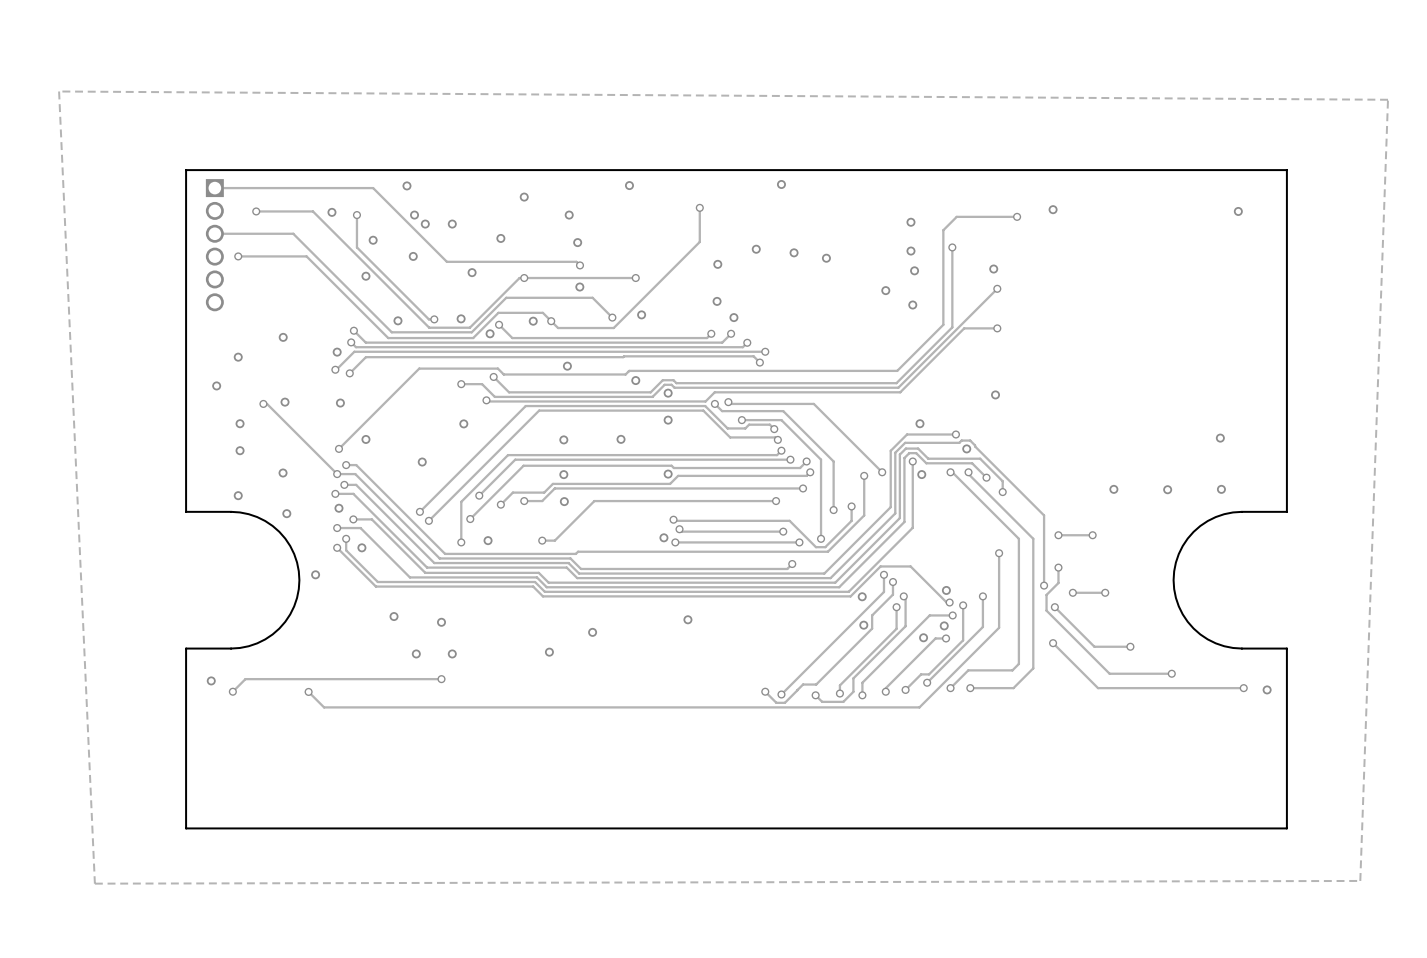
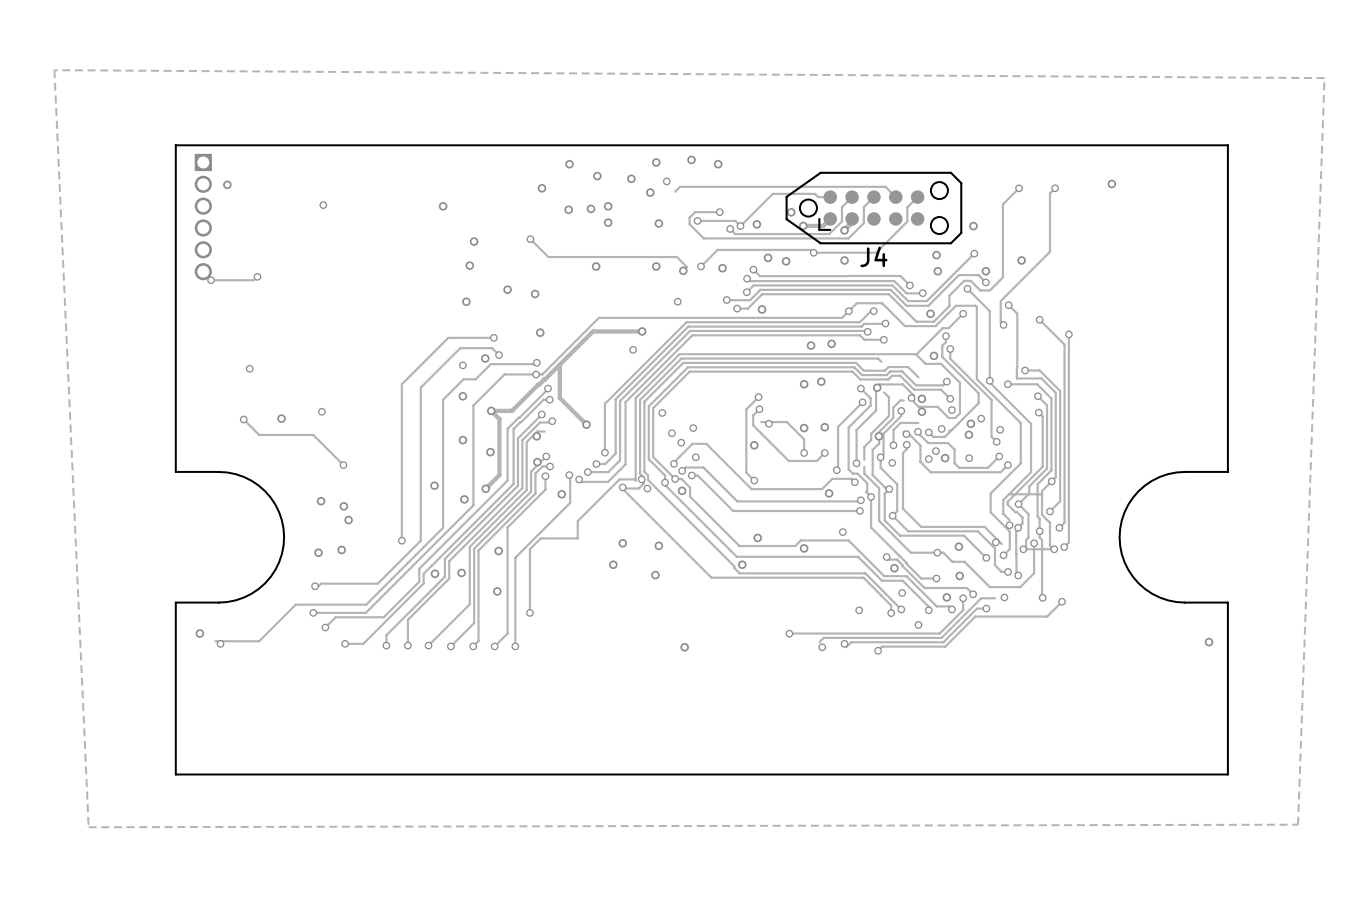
via: (781, 184) -> none
via: (406, 185) -> none
via: (629, 185) -> none
via: none -> (691, 159)
track: (214, 188) (373, 188) (446, 261) (576, 261) (580, 265) -> none
via: none -> (656, 162)
via: none -> (569, 164)
via: none -> (718, 164)
via: (524, 197) -> none
via: none -> (597, 176)
via: none -> (631, 178)
track: (699, 207) (699, 241) (613, 328) (558, 328) (542, 312) (498, 312) (473, 338) (388, 338) (306, 256) (238, 256) -> none
via: (1053, 209) -> none
via: none -> (1111, 183)
via: none -> (227, 184)
track: (256, 211) (312, 211) (429, 327) (469, 327) (519, 278) (635, 278) -> none
via: (256, 211) -> none
via: (1238, 211) -> none
via: (331, 212) -> none
track: (356, 215) (356, 247) (428, 319) (434, 319) -> none
via position: (356, 215) -> (323, 205)
via: (414, 215) -> none
track: none -> (1019, 188) (1002, 204) (1002, 277) (989, 290) (980, 290) (970, 280) (964, 280) (949, 295) (949, 306) (933, 321) (916, 321) (888, 294) (762, 294) (747, 308) (737, 308)
via: none -> (1019, 188)
track: none -> (1055, 188) (1049, 193) (1049, 251) (1000, 301) (1000, 322) (1003, 324)
via: none -> (1055, 188)
track: (1017, 216) (956, 216) (943, 230) (943, 324) (897, 370) (629, 370) (625, 374) (503, 374) (497, 368) (419, 368) (338, 448) -> none
via: (1017, 216) -> none
track: none -> (675, 191) (680, 186) (885, 186) (895, 197)
via: none -> (650, 192)
via: (910, 222) -> none
via: (425, 224) -> none
via position: (452, 224) -> (443, 206)
track: none -> (830, 197) (818, 197) (814, 193) (772, 193) (740, 226) (735, 220) (697, 220)
track: none -> (852, 197) (841, 207) (841, 221) (829, 234) (735, 234) (730, 228)
track: none -> (873, 197) (863, 207) (863, 223) (848, 238) (703, 238) (689, 224) (689, 217) (695, 212) (719, 212)
track: none -> (917, 197) (907, 207) (907, 221) (876, 252) (813, 252) (810, 249) (717, 249) (701, 266)
track: (214, 233) (293, 233) (391, 332) (471, 332) (506, 297) (592, 297) (612, 317) -> none
via: none -> (608, 206)
J4: none -> (873, 208)
via: none -> (590, 208)
via: (500, 238) -> none
via: (373, 240) -> none
via: none -> (719, 212)
via: none -> (791, 212)
via position: (577, 242) -> (568, 209)
track: none -> (830, 218) (823, 225) (803, 225)
track: (952, 247) (952, 327) (896, 383) (676, 383) (673, 380) (662, 380) (650, 392) (509, 392) (493, 376) -> none
via: (952, 247) -> none
via: none -> (697, 220)
via: (756, 249) -> none
via: none -> (608, 222)
via: none -> (658, 223)
via: (910, 251) -> none
via: none -> (740, 226)
via: none -> (803, 225)
via: none -> (973, 226)
via: (238, 256) -> none
via: (413, 256) -> none
via: none -> (730, 228)
via: (826, 258) -> none
via: none -> (844, 230)
via: (717, 264) -> none
via: (580, 265) -> none
track: none -> (530, 239) (548, 257) (676, 257) (687, 267)
via: none -> (530, 239)
via: (993, 269) -> none
via: none -> (474, 241)
via: (914, 270) -> none
via: (472, 272) -> none
via: (365, 276) -> none
via: (524, 278) -> none
via: (635, 278) -> none
via: none -> (813, 252)
track: none -> (974, 253) (926, 301) (908, 301) (892, 285) (753, 285) (746, 292)
via: none -> (974, 253)
via: none -> (936, 255)
via: (579, 287) -> none
via: none -> (768, 257)
track: (997, 288) (898, 387) (674, 387) (671, 384) (664, 384) (652, 396) (494, 396) (482, 384) (461, 384) -> none
via: (997, 288) -> none
via: none -> (1021, 260)
via: none -> (786, 261)
via: none -> (469, 265)
via: none -> (596, 266)
via: none -> (656, 266)
via: none -> (701, 266)
via: none -> (722, 268)
track: none -> (753, 269) (760, 276) (847, 276)
via: none -> (753, 269)
via: none -> (937, 271)
via: none -> (985, 271)
via: (912, 305) -> none
track: none -> (848, 275) (900, 275) (909, 285)
track: none -> (257, 276) (254, 280) (211, 280)
via: none -> (257, 276)
track: none -> (747, 278) (749, 281) (894, 281) (906, 293) (922, 293)
via: none -> (747, 278)
via: none -> (211, 280)
track: none -> (985, 282) (978, 275) (959, 275) (928, 305) (906, 305) (890, 289) (760, 289) (750, 300) (726, 300)
via: none -> (985, 282)
via: (641, 314) -> none
via: none -> (909, 285)
via: (612, 317) -> none
via: (733, 317) -> none
via: (461, 318) -> none
via: (434, 319) -> none
via: (397, 320) -> none
track: none -> (967, 288) (989, 311) (989, 382) (1031, 423) (1031, 472) (1003, 500) (1003, 513) (1009, 520)
via: none -> (967, 288)
via: (551, 321) -> none
via: none -> (746, 292)
track: (499, 324) (512, 338) (707, 338) (711, 333) -> none
via: (499, 324) -> none
via: none -> (922, 293)
via: none -> (535, 294)
track: (997, 328) (964, 328) (900, 392) (714, 392) (705, 401) (486, 400) -> none
via: (997, 328) -> none
track: (353, 330) (365, 342) (722, 342) (731, 333) -> none
via: (353, 330) -> none
via: none -> (726, 300)
via: (731, 333) -> none
via: (283, 337) -> none
track: none -> (1008, 305) (1017, 313) (1016, 378) (1041, 378) (1055, 392) (1055, 477) (1042, 491) (1042, 514) (1049, 522) (1049, 545) (1052, 548)
via: none -> (1008, 305)
via: none -> (737, 308)
via: none -> (762, 309)
track: (351, 342) (355, 347) (742, 347) (747, 342) -> none
via: (351, 342) -> none
via: (747, 342) -> none
via: none -> (848, 311)
track: none -> (873, 311) (870, 311) (859, 322) (686, 322) (604, 403) (604, 452)
via: none -> (873, 311)
via: none -> (930, 313)
track: none -> (963, 313) (948, 328) (942, 328) (916, 354) (679, 354) (635, 398) (635, 480) (619, 479) (577, 521) (577, 538) (540, 538) (529, 549) (529, 612)
via: none -> (963, 313)
track: (765, 351) (354, 351) (335, 369) -> none
via: (765, 351) -> none
via: (337, 352) -> none
track: none -> (1039, 319) (1064, 344) (1064, 522) (1059, 527)
via: none -> (1039, 319)
track: none -> (886, 322) (864, 323) (861, 326) (688, 326) (615, 399) (615, 453) (605, 464) (596, 464)
via: none -> (885, 323)
via: (238, 357) -> none
via: none -> (1003, 324)
track: (759, 362) (753, 356) (365, 357) (349, 373) -> none
via: (759, 362) -> none
track: none -> (642, 331) (592, 331) (512, 410) (491, 410) (499, 419) (499, 475) (485, 488)
via: none -> (642, 331)
track: none -> (868, 330) (690, 330) (620, 401) (620, 460) (608, 472) (587, 472)
via: none -> (867, 331)
track: none -> (1068, 334) (1068, 542) (1064, 547)
via: none -> (1068, 334)
via: (335, 369) -> none
track: none -> (945, 336) (945, 342) (942, 345) (942, 356) (978, 393) (978, 403) (944, 436) (933, 436) (928, 432)
via: none -> (945, 336)
track: none -> (493, 337) (448, 337) (401, 384) (401, 540)
via: none -> (493, 337)
via: (349, 373) -> none
track: none -> (883, 339) (864, 339) (859, 335) (692, 335) (625, 402) (625, 464) (607, 481) (581, 481) (579, 479)
via: none -> (883, 339)
via: (493, 376) -> none
via: none -> (831, 343)
via: none -> (811, 345)
via: (635, 380) -> none
track: none -> (950, 349) (950, 358) (991, 399) (991, 436) (996, 441)
via: none -> (950, 349)
via: (461, 384) -> none
via: none -> (633, 349)
via: (216, 385) -> none
track: none -> (915, 354) (925, 363) (941, 363) (959, 382) (959, 413) (955, 418) (948, 418) (937, 406) (918, 406) (913, 402) (913, 395) (902, 384) (880, 384) (876, 388) (876, 410) (856, 429) (856, 463)
track: none -> (499, 355) (492, 348) (460, 348) (420, 387) (420, 540) (377, 583) (321, 583) (315, 586)
via: none -> (499, 355)
via: none -> (485, 358)
via: (668, 393) -> none
via position: (995, 394) -> (933, 355)
track: none -> (881, 361) (878, 358) (681, 358) (640, 399) (640, 473) (643, 477) (643, 483) (638, 488) (622, 487) (622, 488) (711, 577) (863, 577) (891, 605) (891, 613)
track: none -> (536, 362) (490, 364) (475, 379) (463, 379) (443, 399) (443, 527) (366, 604) (295, 604) (259, 641) (215, 641)
via: none -> (536, 362)
track: none -> (559, 364) (559, 397) (586, 424)
via: (285, 402) -> none
track: (728, 402) (730, 403) (813, 403) (882, 472) -> none
via: (728, 402) -> none
track: (263, 403) (267, 403) (337, 474) (355, 474) (439, 558) (570, 558) (581, 568) (787, 568) (792, 564) -> none
via: (340, 403) -> none
track: (714, 403) (722, 411) (783, 411) (833, 461) (833, 510) -> none
via: (714, 403) -> none
track: none -> (1025, 370) (1039, 370) (1060, 390) (1060, 501) (1049, 511)
via: none -> (1025, 370)
via: none -> (536, 374)
track: none -> (918, 377) (908, 367) (888, 367) (884, 370) (863, 370) (856, 362) (683, 362) (644, 401) (644, 471) (648, 475) (648, 479) (739, 573) (865, 573) (885, 593)
via: none -> (989, 380)
via: none -> (821, 381)
track: none -> (946, 381) (943, 385) (916, 385) (902, 371) (890, 371) (886, 375) (862, 375) (854, 367) (687, 367) (648, 406) (648, 459) (665, 475) (665, 485) (736, 556) (858, 556) (881, 580) (902, 580) (928, 606) (928, 610)
via: none -> (946, 381)
via: (668, 420) -> none
track: (741, 420) (781, 420) (821, 459) (821, 538) -> none
via: (741, 420) -> none
via: none -> (804, 384)
track: none -> (1007, 384) (1037, 384) (1051, 398) (1051, 470) (1037, 484) (1037, 516) (1039, 518) (1039, 537) (1042, 539) (1042, 597)
via: none -> (1007, 384)
via: (240, 423) -> none
via position: (463, 423) -> (462, 396)
via: none -> (547, 388)
track: none -> (860, 388) (870, 398) (870, 405) (848, 427) (848, 469) (852, 473) (857, 473) (867, 483) (867, 493)
via: none -> (860, 388)
track: none -> (884, 392) (888, 397) (888, 416) (871, 433) (871, 440) (864, 447) (864, 459)
track: (774, 429) (769, 424) (749, 424) (745, 428) (727, 428) (705, 406) (525, 406) (419, 511) -> none
via: (774, 429) -> none
track: none -> (1037, 396) (1047, 405) (1047, 468) (1029, 486) (1029, 493) (1018, 504) (1028, 514) (1028, 537) (1026, 539) (1026, 549) (1024, 551)
via: none -> (1037, 396)
track: none -> (758, 397) (746, 409) (746, 472) (754, 480)
via: none -> (758, 397)
track: (955, 434) (907, 434) (890, 450) (890, 507) (824, 573) (579, 573) (568, 563) (434, 563) (356, 484) (344, 484) -> none
via: none -> (921, 398)
track: none -> (950, 398) (941, 389) (914, 389) (900, 375) (892, 375) (888, 379) (860, 379) (852, 371) (689, 371) (653, 408) (653, 456) (675, 479) (681, 479) (690, 487) (690, 496) (739, 546) (795, 546) (800, 540) (848, 540) (884, 576) (906, 576) (936, 606) (948, 606) (951, 609)
via: none -> (950, 398)
via: none -> (549, 399)
track: none -> (903, 400) (900, 400) (893, 407) (893, 417) (879, 431) (879, 443) (872, 449) (872, 475) (886, 489) (889, 489) (884, 493) (884, 520) (900, 535) (964, 535) (986, 557)
via: (1220, 438) -> none
via: (365, 439) -> none
via: (563, 439) -> none
via position: (621, 439) -> (586, 424)
track: (777, 439) (775, 437) (730, 437) (703, 410) (539, 410) (428, 520) -> none
via: (777, 439) -> none
track: none -> (862, 402) (838, 426) (836, 470)
via: none -> (862, 402)
track: none -> (759, 409) (753, 415) (753, 425) (788, 460) (816, 460) (824, 453)
via: none -> (759, 409)
via: none -> (951, 410)
via: none -> (491, 410)
track: none -> (901, 410) (901, 416) (883, 433) (883, 454) (880, 457) (880, 467) (897, 484) (897, 511) (892, 515) (908, 531) (977, 531) (994, 548) (994, 565) (1001, 571) (1008, 571)
via: none -> (901, 410)
track: none -> (1038, 412) (1042, 416) (1042, 466) (1007, 501) (1007, 504) (1022, 517) (1022, 523) (1016, 529) (1016, 554)
via: none -> (1038, 412)
via: (240, 450) -> none
via: none -> (662, 412)
track: (781, 450) (777, 455) (545, 455) -> (547, 388) (519, 417)
via: (781, 450) -> none
track: none -> (541, 414) (517, 438) (517, 485) (444, 558) (444, 576) (386, 635) (386, 645)
via: none -> (541, 414)
track: (544, 455) (508, 455) (461, 501) (461, 542) -> (518, 417) (507, 428) (507, 480) (419, 568) (419, 581) (383, 617) (335, 617) (325, 627)
track: none -> (243, 419) (259, 434) (313, 434) (343, 465)
via: none -> (243, 419)
via: none -> (981, 418)
track: none -> (552, 421) (540, 422) (522, 440) (522, 488) (449, 561) (449, 578) (407, 619) (407, 645)
via: none -> (552, 421)
track: (546, 459) (515, 459) (479, 495) -> (520, 422) (513, 428) (513, 483) (423, 573) (423, 583) (363, 643) (345, 643)
track: (790, 459) (547, 459) -> (549, 399) (543, 399) (521, 422)
via: (790, 459) -> none
track: none -> (761, 422) (786, 422) (804, 439) (804, 453)
track: none -> (918, 422) (900, 422) (893, 429) (893, 445)
track: none -> (1020, 422) (1020, 463) (990, 493) (990, 512) (1009, 531) (1009, 549) (1003, 555)
track: none -> (1020, 422) (976, 379) (975, 305) (955, 305) (935, 326) (905, 326) (882, 303) (856, 303) (842, 317) (598, 317) (542, 374) (504, 374) (473, 405) (473, 505) (365, 612) (313, 612)
track: (806, 461) (800, 468) (523, 465) (470, 519) -> none
track: (912, 461) (912, 527) (848, 591) (544, 591) (535, 582) (377, 582) (346, 550) (346, 538) -> none
via: (912, 461) -> none
via: none -> (970, 423)
via: (422, 462) -> none
track: (346, 465) (356, 465) (445, 553) (827, 551) (864, 515) (864, 475) -> none
via: (346, 465) -> none
via: none -> (693, 428)
via: none -> (804, 428)
via: none -> (824, 427)
via: none -> (941, 428)
via: none -> (1000, 429)
track: none -> (544, 431) (537, 431) (526, 442) (526, 489) (469, 546) (469, 604) (428, 645)
track: none -> (903, 431) (906, 435) (910, 435) (920, 445) (920, 461) (930, 472) (1000, 472) (1007, 465)
track: none -> (918, 431) (928, 443) (948, 443) (954, 449) (954, 463) (959, 467) (987, 467) (999, 456)
via: none -> (918, 431)
via: none -> (928, 432)
via: none -> (671, 433)
track: (810, 472) (806, 475) (678, 475) (670, 483) (552, 483) (544, 492) (512, 492) (500, 504) -> none
via: (810, 472) -> none
via: (882, 472) -> none
track: (950, 472) (1018, 538) (1018, 663) (1012, 670) (968, 670) (950, 688) -> none
track: (968, 472) (1033, 538) (1033, 668) (1013, 688) (970, 688) -> none
via: (968, 472) -> none
via: none -> (968, 434)
via position: (283, 473) -> (281, 418)
via: (337, 474) -> none
via: (668, 474) -> none
via: (864, 475) -> none
track: (986, 477) (972, 463) (926, 463) (916, 453) (909, 453) (904, 458) (904, 521) (839, 587) (546, 587) (536, 577) (409, 577) (360, 528) (337, 528) -> none
via: (986, 477) -> none
via: none -> (462, 440)
via: none -> (996, 441)
via: none -> (681, 442)
via: none -> (754, 445)
via: none -> (893, 445)
track: none -> (906, 444) (906, 449) (902, 452) (902, 508) (921, 526) (984, 526) (1001, 544)
via: none -> (906, 444)
via: (344, 484) -> none
track: (803, 488) (554, 488) (542, 501) (524, 501) -> none
via: (803, 488) -> none
via: none -> (935, 451)
via: (1113, 489) -> none
via: (1167, 489) -> none
via: (1221, 489) -> none
via: none -> (490, 452)
via: none -> (604, 452)
via: none -> (804, 453)
via: none -> (824, 453)
track: (1002, 492) (1002, 481) (980, 458) (928, 458) (918, 448) (905, 448) (899, 454) (899, 518) (835, 582) (548, 582) (538, 572) (425, 572) (371, 519) (353, 519) -> none
via: (1002, 492) -> none
track: (335, 493) (353, 493) (427, 567) (566, 567) (577, 578) (830, 578) (895, 513) (895, 452) (905, 442) (959, 442) (961, 440) (970, 440) (1044, 515) (1044, 585) -> none
via: (335, 493) -> none
via: (238, 495) -> none
via: (479, 495) -> none
track: none -> (546, 456) (531, 471) (531, 491) (474, 548) (474, 623) (450, 646)
via: none -> (546, 456)
via: none -> (999, 456)
via: none -> (695, 457)
via: none -> (880, 457)
via: none -> (945, 458)
via: none -> (969, 458)
via: none -> (928, 459)
via: (524, 501) -> none
track: (776, 501) (594, 501) (554, 540) (542, 540) -> none
via: (776, 501) -> none
track: none -> (673, 463) (692, 443) (706, 443) (751, 489) (822, 489) (832, 478) (851, 478) (854, 482)
via: none -> (856, 463)
via: none -> (892, 462)
via: none -> (596, 464)
via: none -> (673, 463)
via: none -> (343, 465)
via: (500, 504) -> none
via: none -> (1007, 465)
track: none -> (550, 466) (542, 466) (535, 473) (535, 493) (478, 550) (478, 641) (473, 646)
via: none -> (550, 466)
track: (851, 506) (851, 520) (825, 547) (815, 547) (789, 520) (673, 519) -> none
via: (851, 506) -> none
track: none -> (864, 466) (864, 473) (879, 488) (879, 521) (910, 552) (943, 552) (952, 561) (964, 561) (989, 587) (1020, 587) (1034, 573) (1034, 543)
via: (338, 508) -> none
track: none -> (682, 470) (685, 467) (703, 467) (737, 501) (860, 500)
via: none -> (682, 470)
via: (833, 510) -> none
via: none -> (836, 470)
via: (419, 511) -> none
via: none -> (587, 472)
via: (286, 513) -> none
track: none -> (569, 475) (570, 502) (515, 557) (515, 646)
via: none -> (569, 475)
track: none -> (691, 475) (697, 475) (733, 510) (859, 510)
via: none -> (691, 475)
track: none -> (545, 476) (545, 489) (507, 527) (507, 633) (494, 646)
via: none -> (545, 476)
via: (353, 519) -> none
via: (470, 519) -> none
via: none -> (579, 479)
via: none -> (675, 479)
via: (428, 520) -> none
via: none -> (754, 480)
via: none -> (1051, 481)
via: none -> (854, 482)
via: none -> (665, 482)
via: none -> (434, 485)
via: (337, 528) -> none
via: none -> (622, 487)
via: none -> (485, 488)
track: (679, 529) (681, 531) (783, 531) -> none
via: none -> (889, 489)
via: none -> (682, 490)
via: (783, 531) -> none
track: none -> (865, 491) (871, 496) (871, 527) (921, 578) (936, 578)
via: none -> (829, 493)
via: none -> (561, 494)
via: (1058, 535) -> none
via: (1092, 535) -> none
via: (663, 537) -> none
via: none -> (871, 496)
via: (346, 538) -> none
via: (821, 538) -> none
via: (542, 540) -> none
via: none -> (860, 500)
via: none -> (321, 501)
via: (461, 542) -> none
via: (675, 542) -> none
track: (799, 542) (675, 542) -> none
via: (799, 542) -> none
via: none -> (1018, 504)
track: (337, 547) (375, 586) (533, 586) (542, 596) (850, 596) (880, 566) (910, 566) (946, 602) (949, 602) -> none
via: (337, 547) -> none
via: none -> (859, 510)
track: (999, 553) (999, 627) (919, 707) (324, 707) (308, 691) -> none
via: (999, 553) -> none
via: none -> (1049, 511)
via: none -> (892, 515)
via: none -> (348, 520)
via: (792, 564) -> none
track: (1058, 567) (1058, 583) (1046, 594) (1046, 610) (1109, 673) (1171, 673) -> none
via: none -> (1018, 527)
via: none -> (1059, 527)
via: none -> (1039, 531)
via: (315, 574) -> none
track: (883, 574) (883, 591) (781, 694) -> none
via: none -> (757, 537)
track: (892, 582) (892, 594) (872, 615) (872, 628) (816, 684) (803, 684) (797, 689) -> none
via: (892, 582) -> none
via: none -> (401, 540)
via: none -> (622, 543)
via: none -> (1034, 543)
via: none -> (658, 545)
via: (946, 590) -> none
via: none -> (958, 546)
via: none -> (1064, 547)
via: none -> (804, 548)
via: none -> (341, 549)
via: none -> (498, 551)
via: none -> (318, 552)
via: (862, 596) -> none
track: (903, 596) (905, 598) (905, 626) (853, 678) (853, 691) (843, 701) (822, 701) (815, 695) -> none
via: (903, 596) -> none
track: (982, 596) (982, 626) (927, 682) -> none
track: none -> (1016, 554) (1016, 573) (1018, 575)
via: none -> (1003, 555)
track: none -> (886, 557) (889, 559) (897, 559) (924, 587) (966, 587) (973, 594)
via: none -> (886, 557)
via: none -> (986, 557)
via: (949, 602) -> none
track: (963, 605) (963, 640) (929, 674) (921, 674) (905, 689) -> none
via: (963, 605) -> none
track: (896, 607) (896, 628) (839, 685) (839, 693) -> none
via: (896, 607) -> none
track: (1054, 607) (1094, 646) (1130, 646) -> none
via: (1054, 607) -> none
via: none -> (613, 564)
via: none -> (742, 564)
via: none -> (894, 568)
track: (952, 615) (929, 615) (862, 682) (862, 695) -> none
via: (952, 615) -> none
via: (394, 616) -> none
via: none -> (1008, 571)
via: none -> (461, 572)
via: none -> (959, 575)
via: none -> (1018, 575)
via position: (441, 622) -> (434, 573)
via: none -> (936, 578)
via: (863, 625) -> none
via: (944, 625) -> none
via: none -> (315, 586)
via: (592, 632) -> none
via: (923, 637) -> none
track: (946, 638) (935, 638) (885, 688) (885, 691) -> none
track: none -> (885, 594) (901, 609)
via: none -> (973, 594)
via: none -> (946, 597)
track: (1053, 643) (1098, 688) (1243, 688) -> none
via: none -> (1042, 597)
track: none -> (963, 598) (963, 610) (939, 633) (789, 633)
via: none -> (963, 598)
track: none -> (994, 598) (981, 598) (941, 637) (823, 637) (819, 642)
via position: (1130, 646) -> (1062, 601)
track: none -> (1062, 601) (1047, 616) (975, 616) (945, 646) (882, 646) (878, 650)
via position: (549, 652) -> (497, 591)
via: (416, 653) -> none
via: (452, 653) -> none
track: none -> (986, 608) (977, 608) (943, 642) (851, 642) (846, 647)
via: none -> (986, 608)
via: none -> (901, 609)
via: none -> (951, 609)
via: none -> (859, 610)
via: none -> (928, 610)
via: none -> (313, 612)
via: none -> (529, 612)
via: none -> (891, 613)
via: none -> (918, 624)
via: (1171, 673) -> none
via: none -> (325, 627)
track: (441, 679) (245, 679) (232, 691) -> none
via: (441, 679) -> none
via: none -> (789, 633)
via: (927, 682) -> none
via: (950, 688) -> none
via: (970, 688) -> none
via: (1243, 688) -> none
via: (905, 689) -> none
track: (797, 690) (784, 702) (776, 702) (765, 691) -> none
via: (308, 691) -> none
via: none -> (345, 643)
via: (765, 691) -> none
via: none -> (386, 645)
via: none -> (407, 645)
via: none -> (428, 645)
via: (839, 693) -> none
via: none -> (450, 646)
via: none -> (473, 646)
via: none -> (494, 646)
via: none -> (515, 646)
via: (781, 694) -> none
via: none -> (684, 647)
via: (815, 695) -> none
via: none -> (878, 650)

